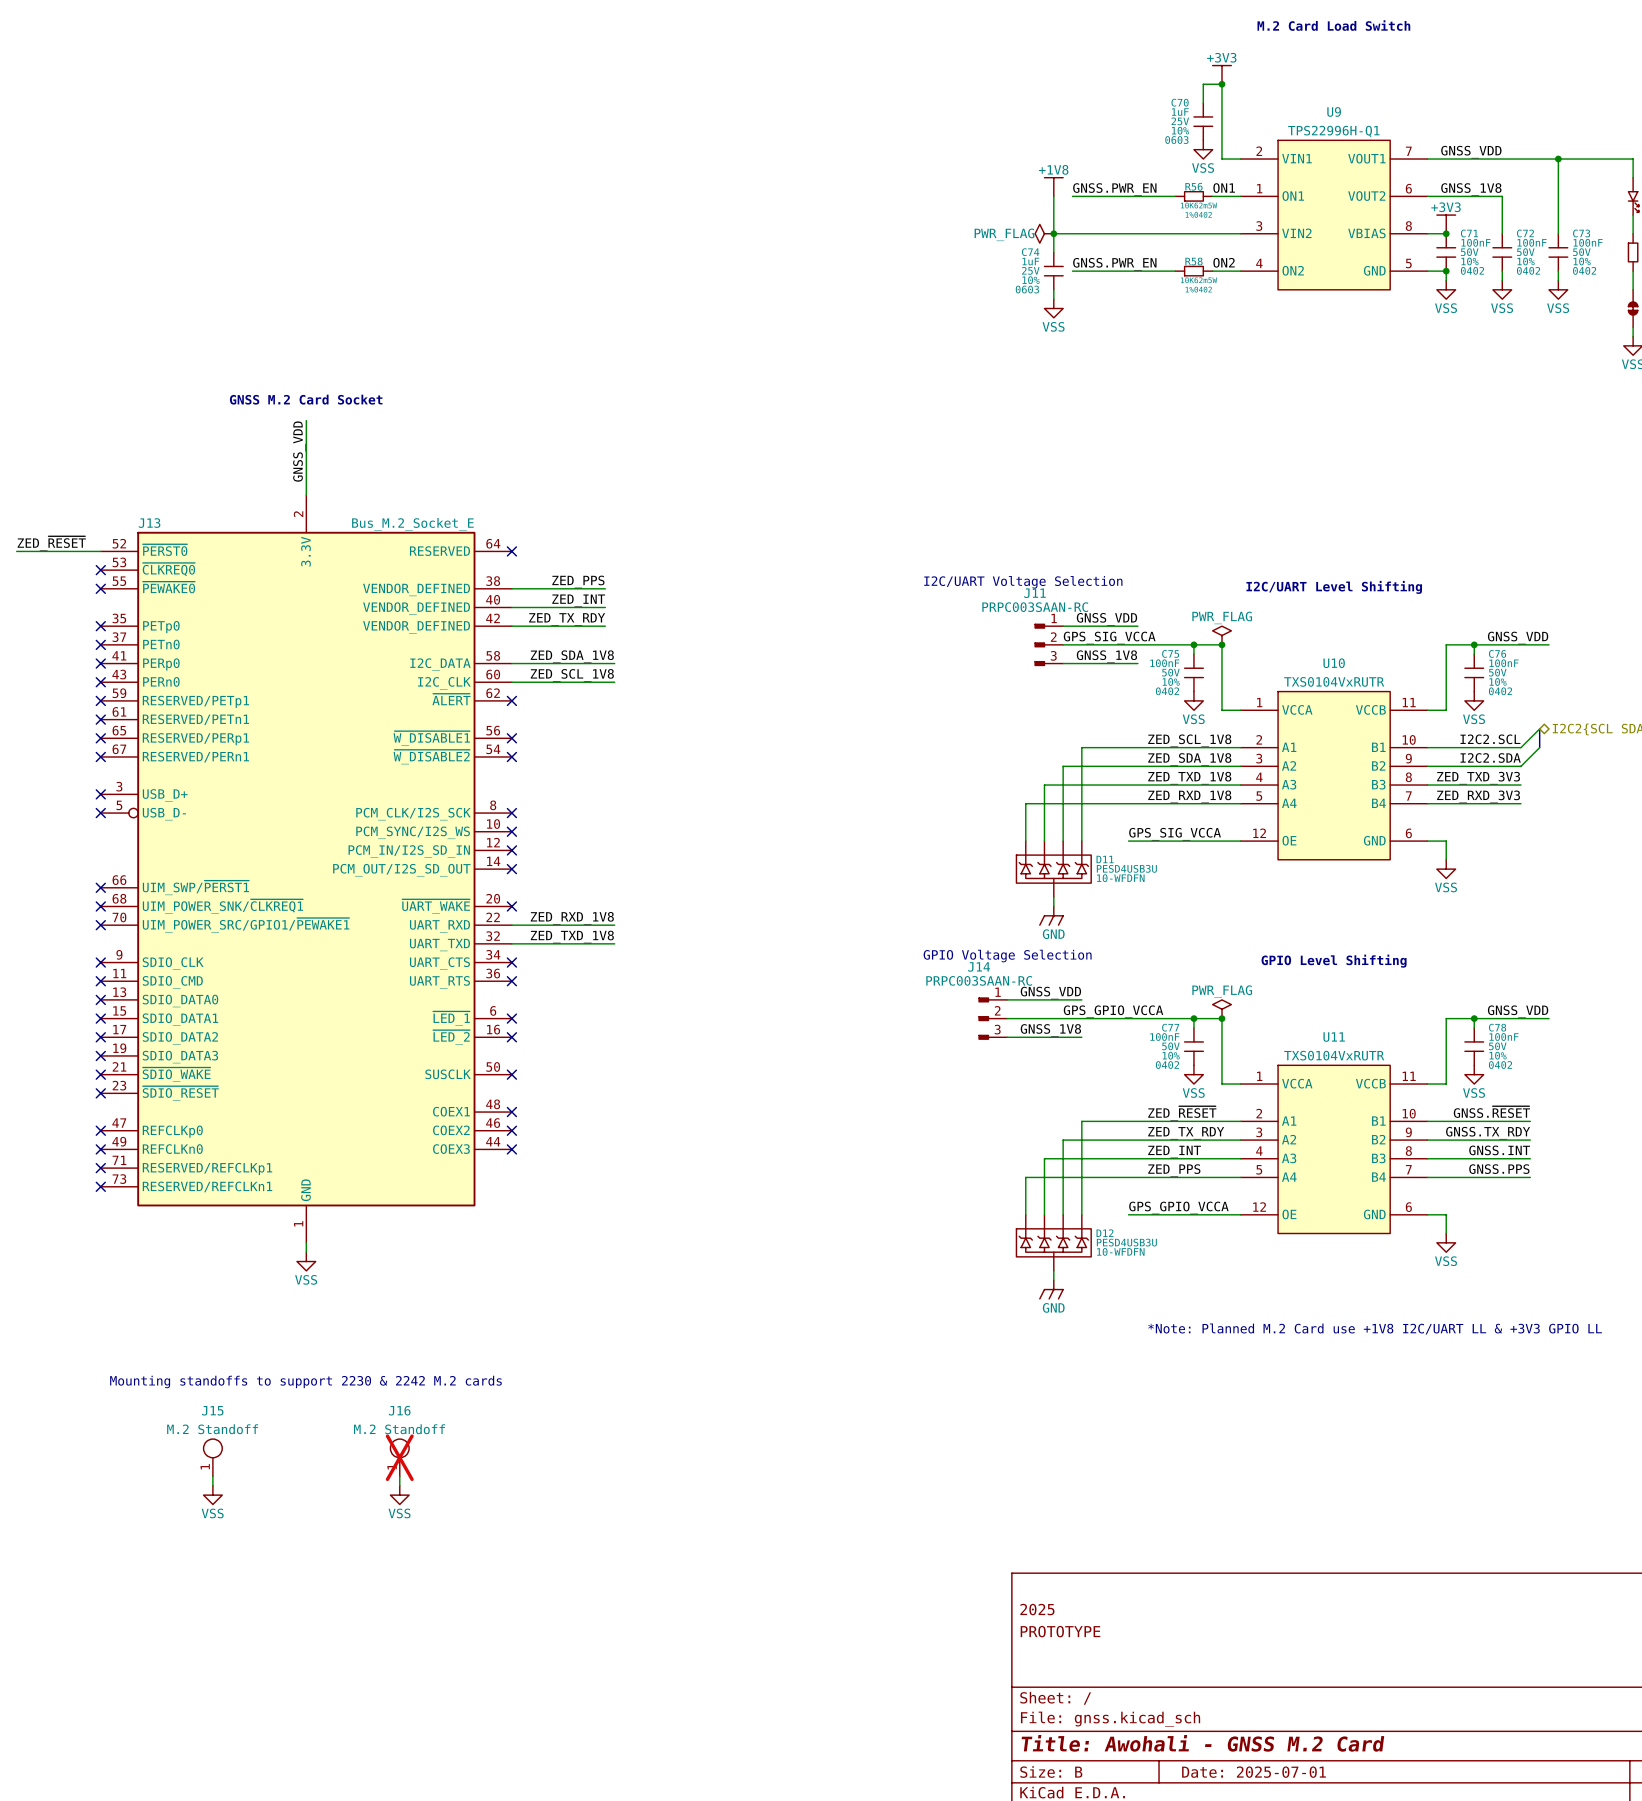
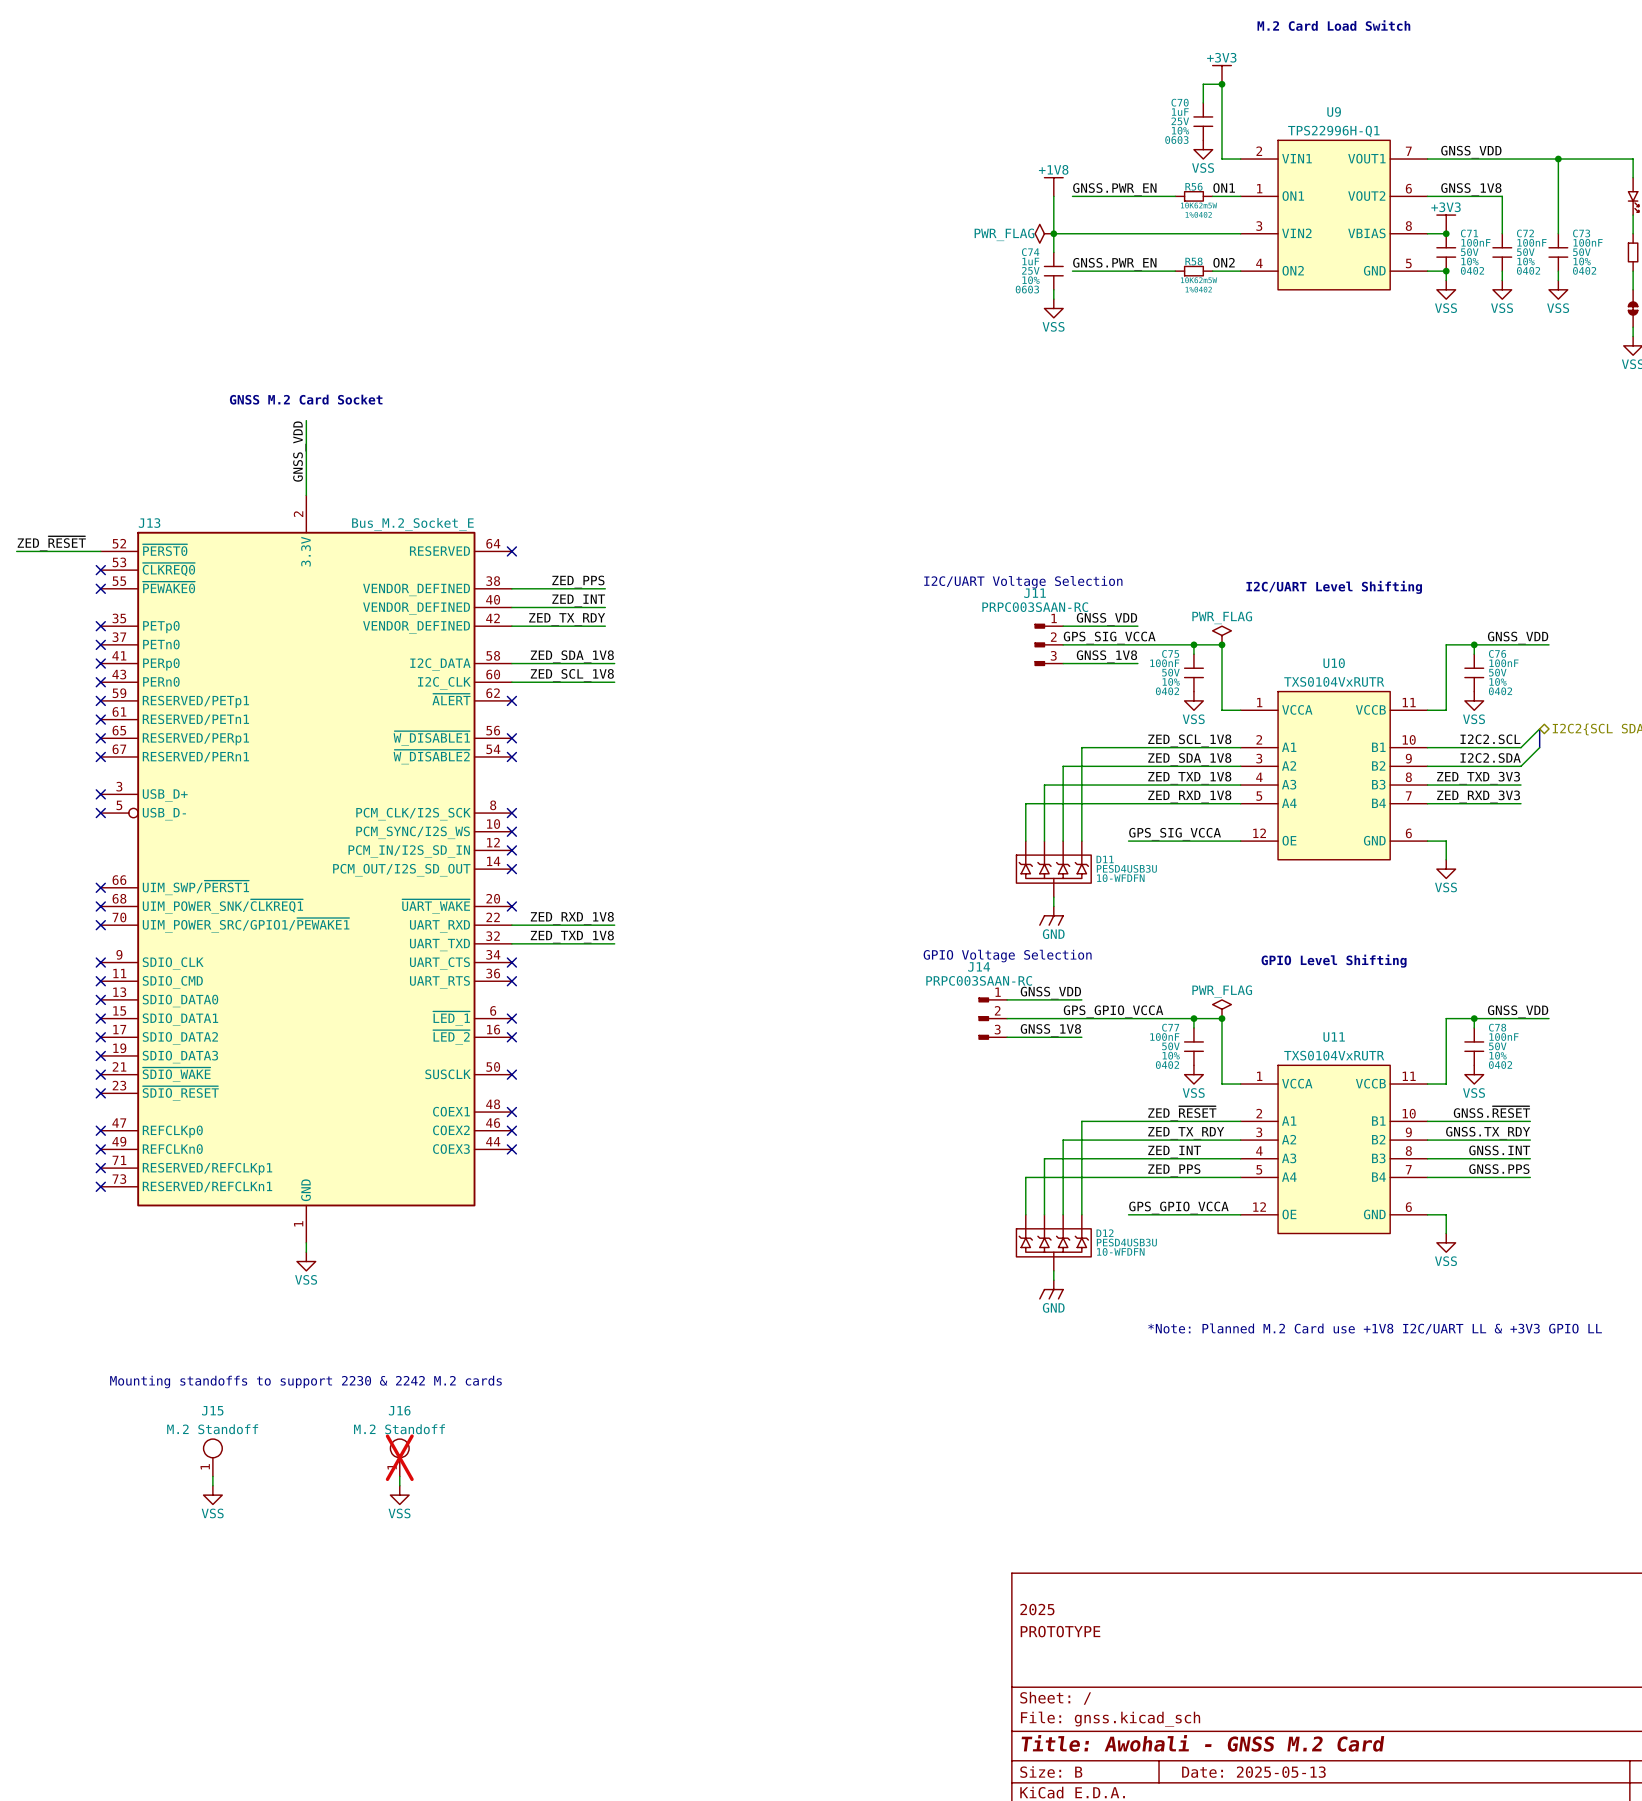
title block: Date: 2025-07-01 (1253, 1772) -> Date: 2025-05-13 (1253, 1772)

